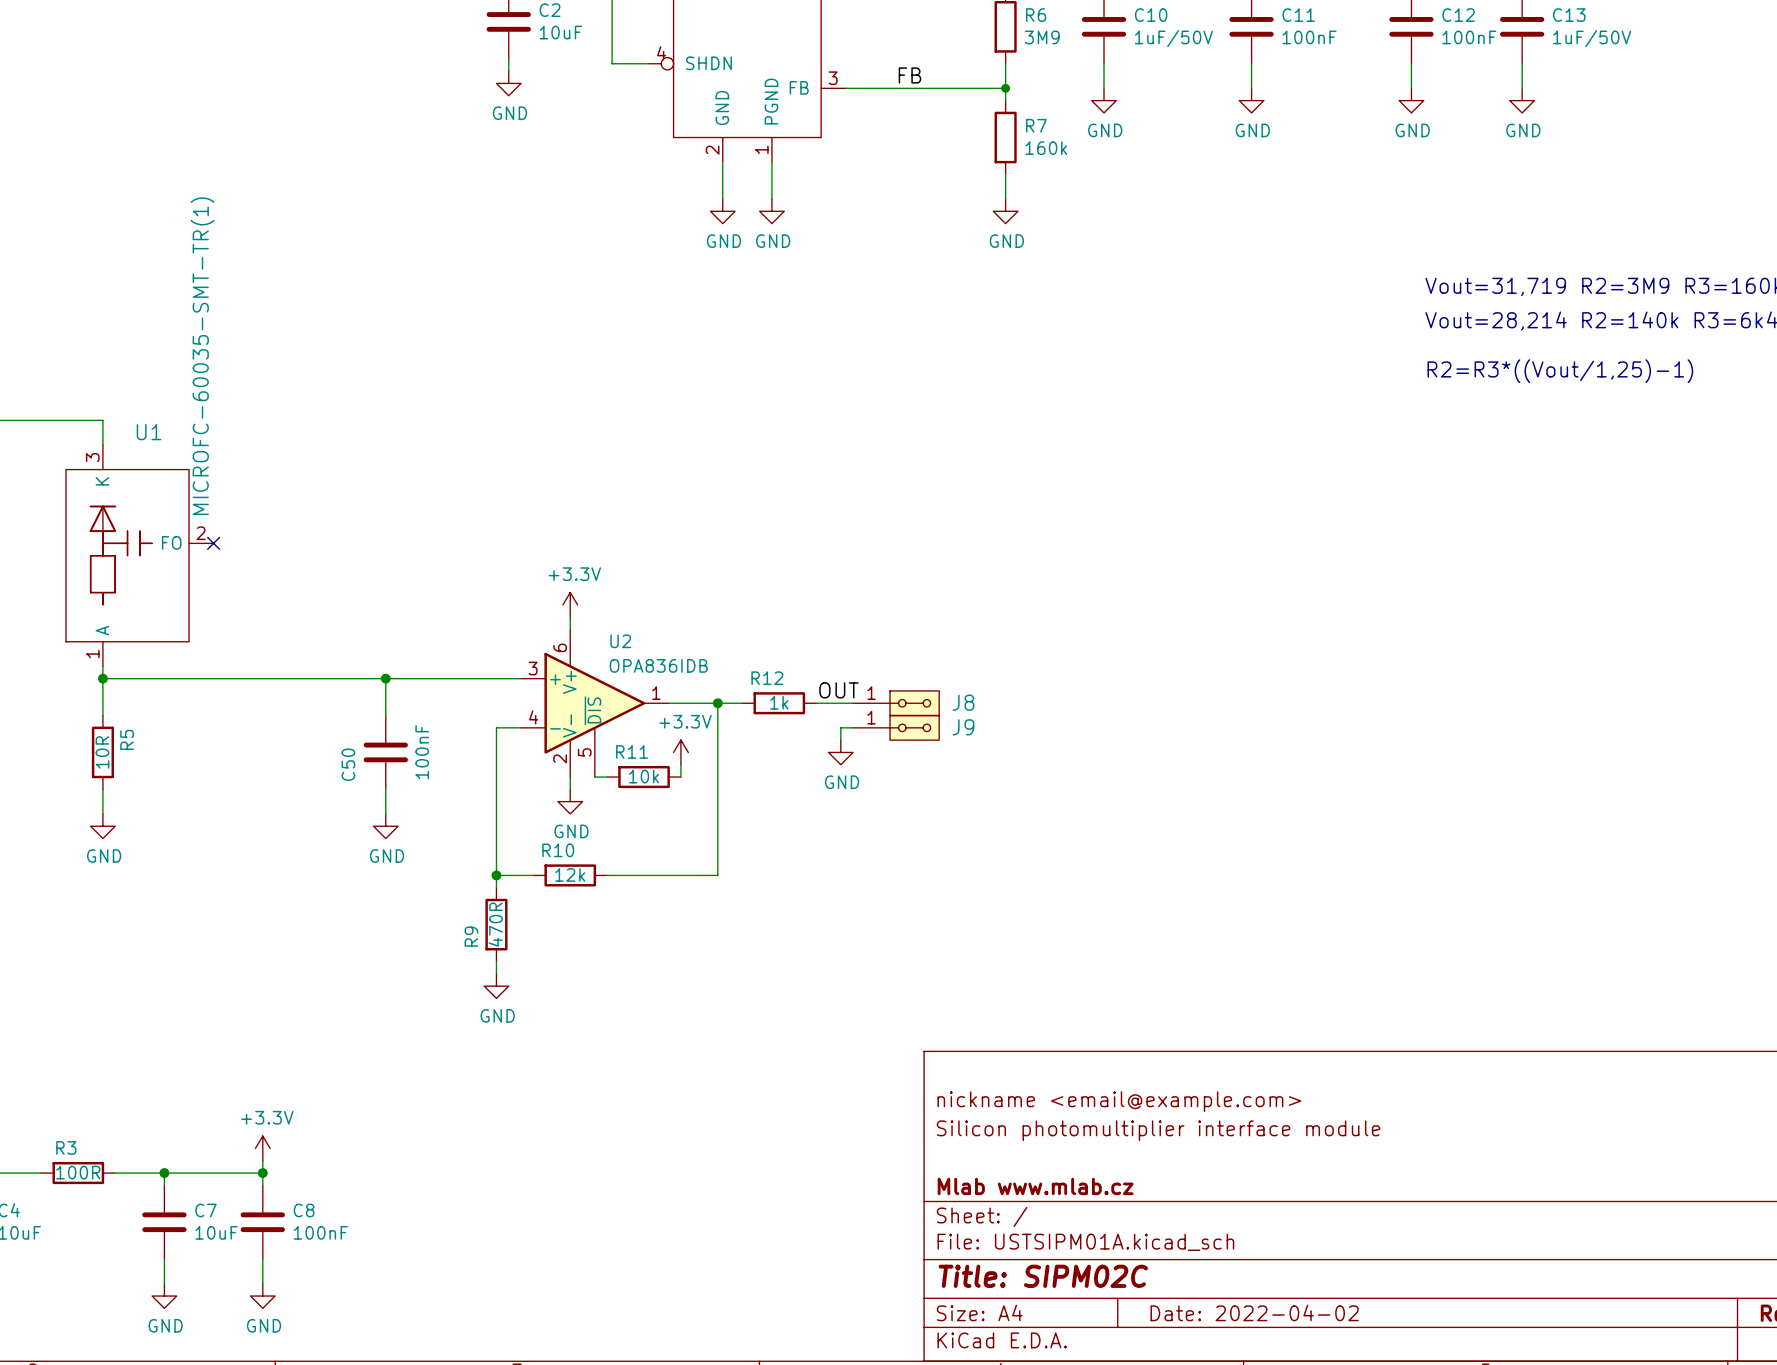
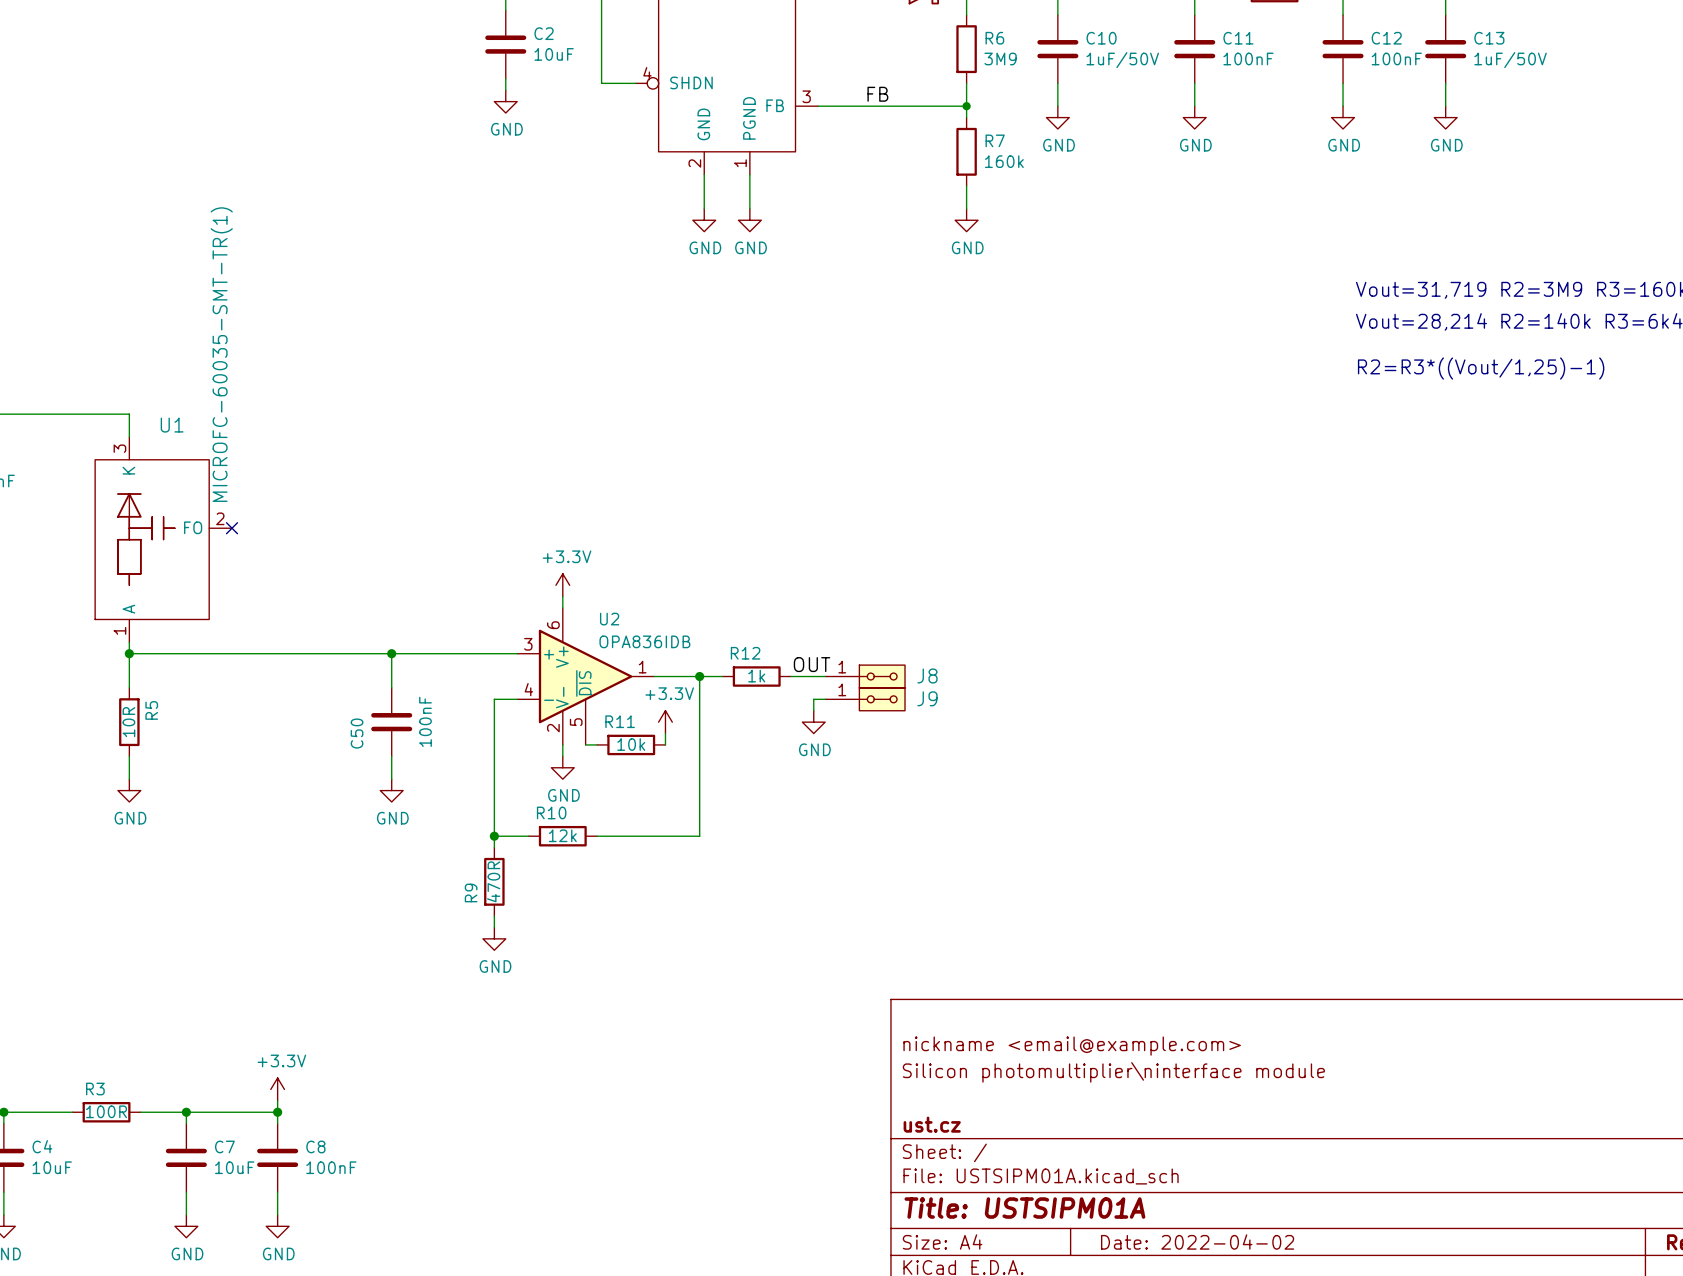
title block: Silicon photomultiplier interface module (1158, 1130) -> Silicon photomultiplier\ninterface module (1113, 1072)
title block: Mlab www.mlab.cz (1035, 1186) -> ust.cz (932, 1124)
title block: Title: SIPM02C (1043, 1276) -> Title: USTSIPM01A (1024, 1208)

